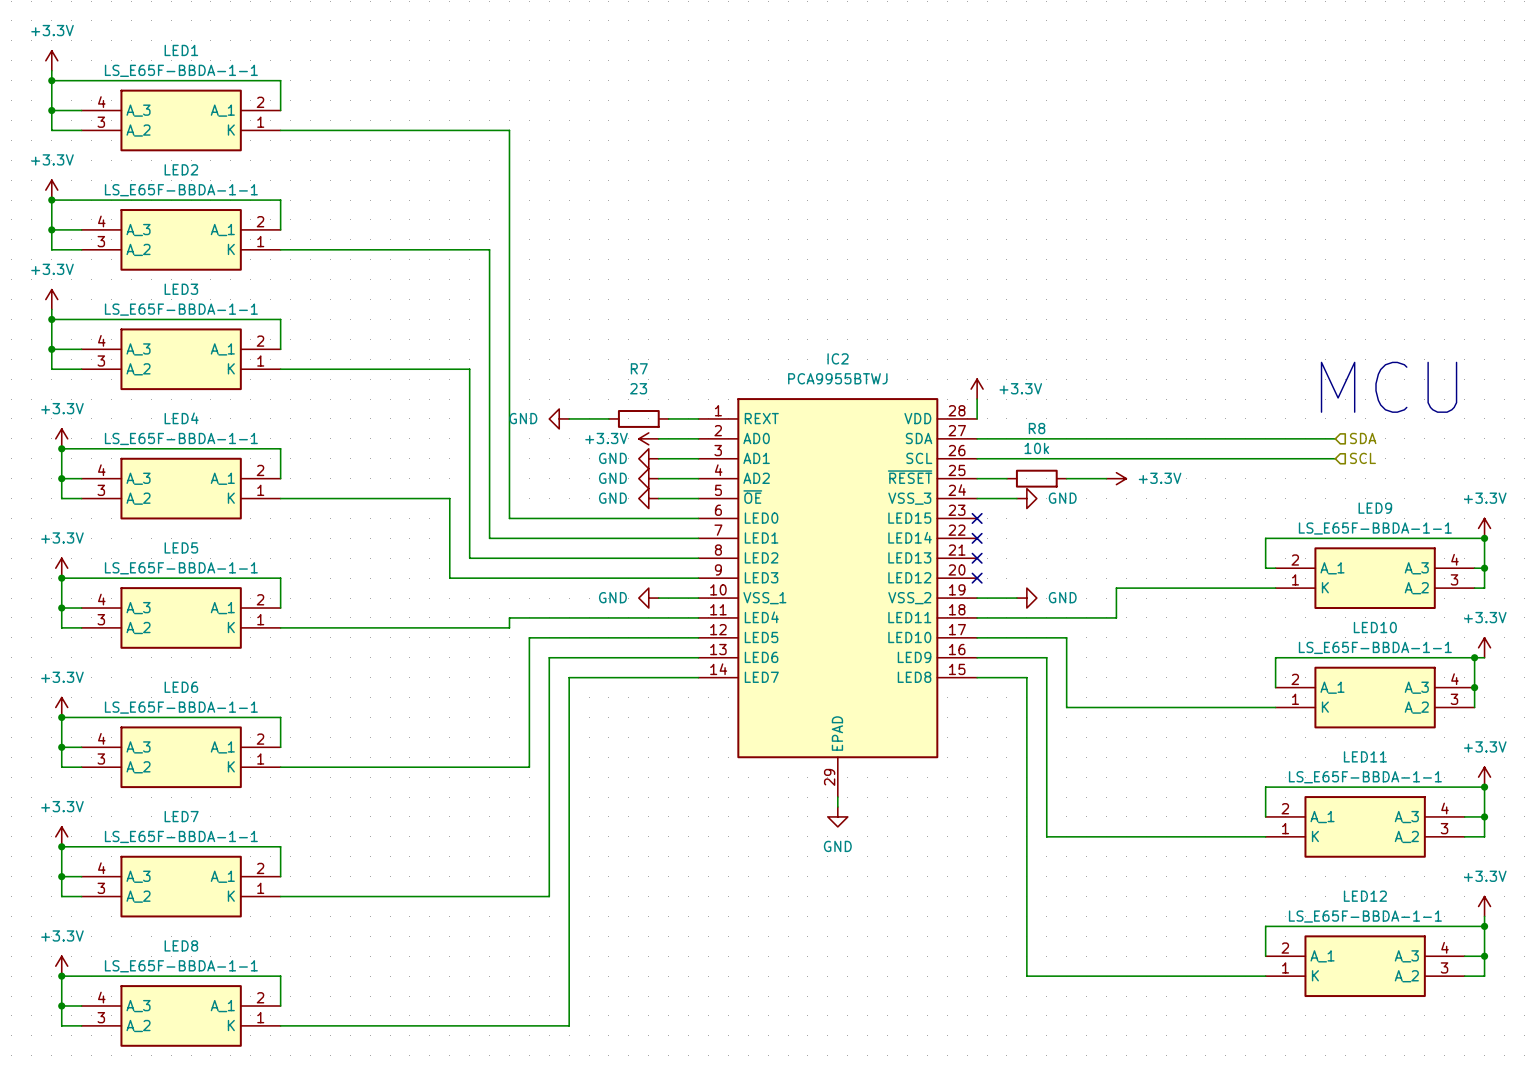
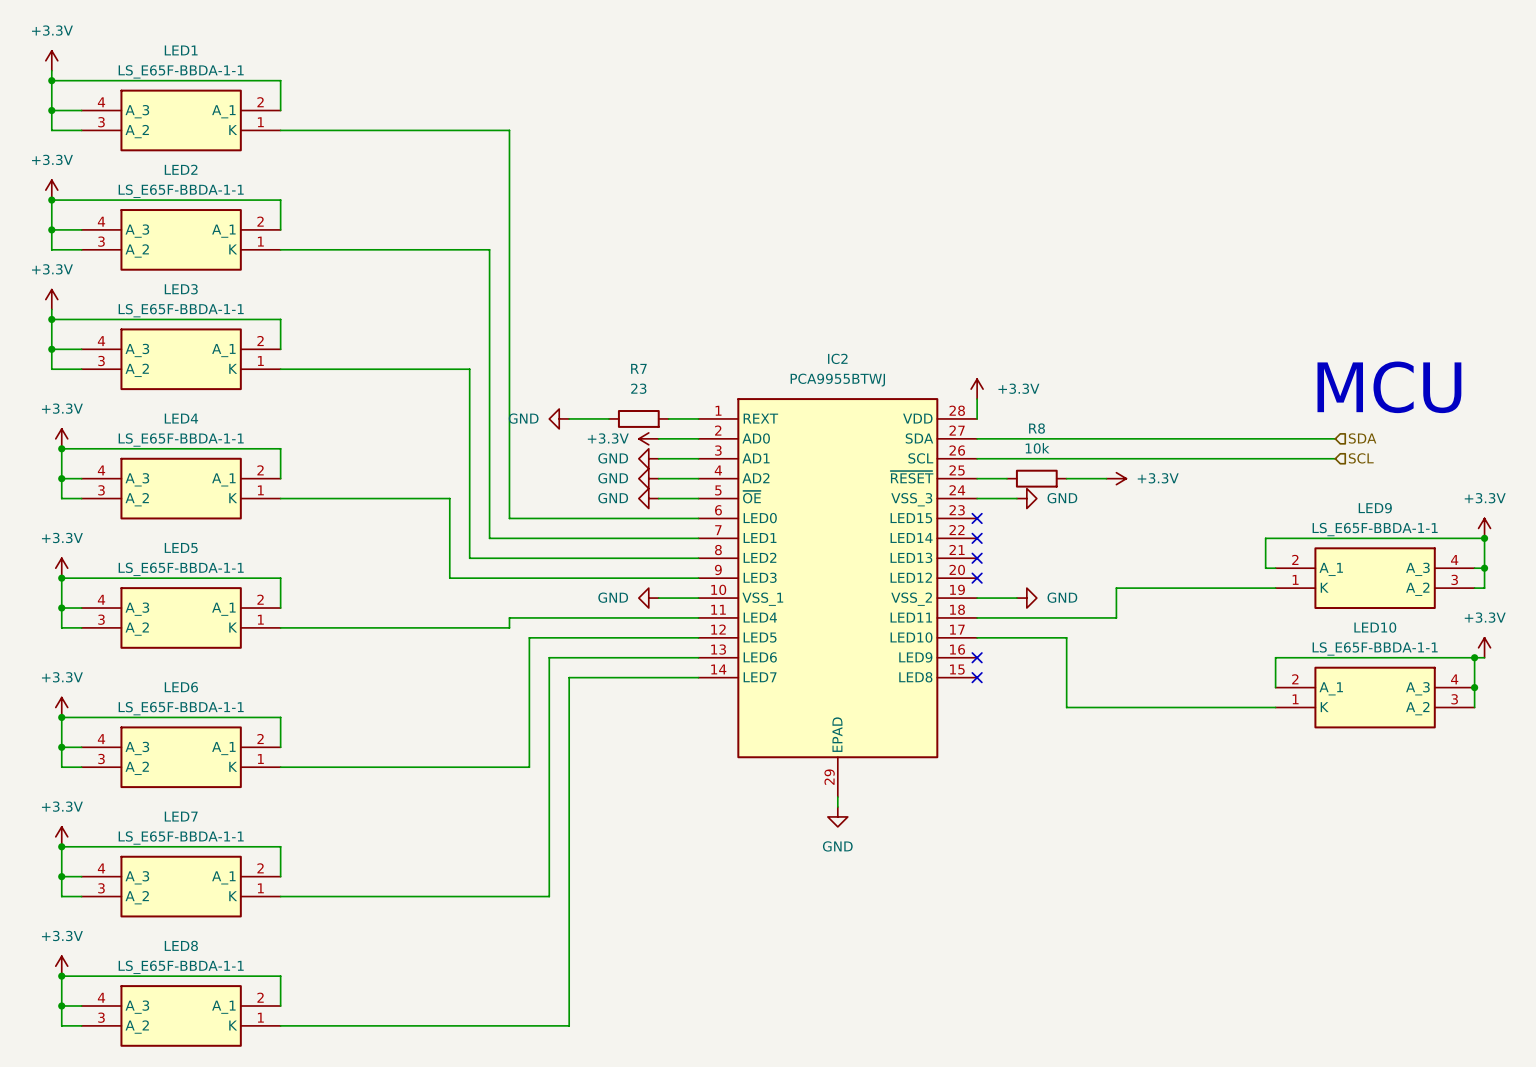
wire: (977, 657) (1046, 657) (1046, 836) (1265, 836) -> none
no-connect mark: none -> (977, 657)
wire: (977, 677) (1026, 677) (1026, 976) (1265, 976) -> none
no-connect mark: none -> (977, 677)
power symbol: +3.3V (1484, 777) -> none
junction: (1484, 787) -> none
wire: (1265, 816) (1265, 787) (1484, 787) (1484, 836) (1464, 836) -> none
wire: (1464, 816) (1484, 816) -> none
junction: (1484, 816) -> none
LED11: LS_E65F-BBDA-1-1 (1365, 826) -> none
power symbol: +3.3V (1484, 906) -> none
wire: (1484, 916) (1484, 976) (1464, 976) -> none
wire: (1484, 926) (1265, 926) (1265, 956) -> none
junction: (1484, 926) -> none
wire: (1464, 956) (1484, 956) -> none
junction: (1484, 956) -> none
LED12: LS_E65F-BBDA-1-1 (1365, 966) -> none

